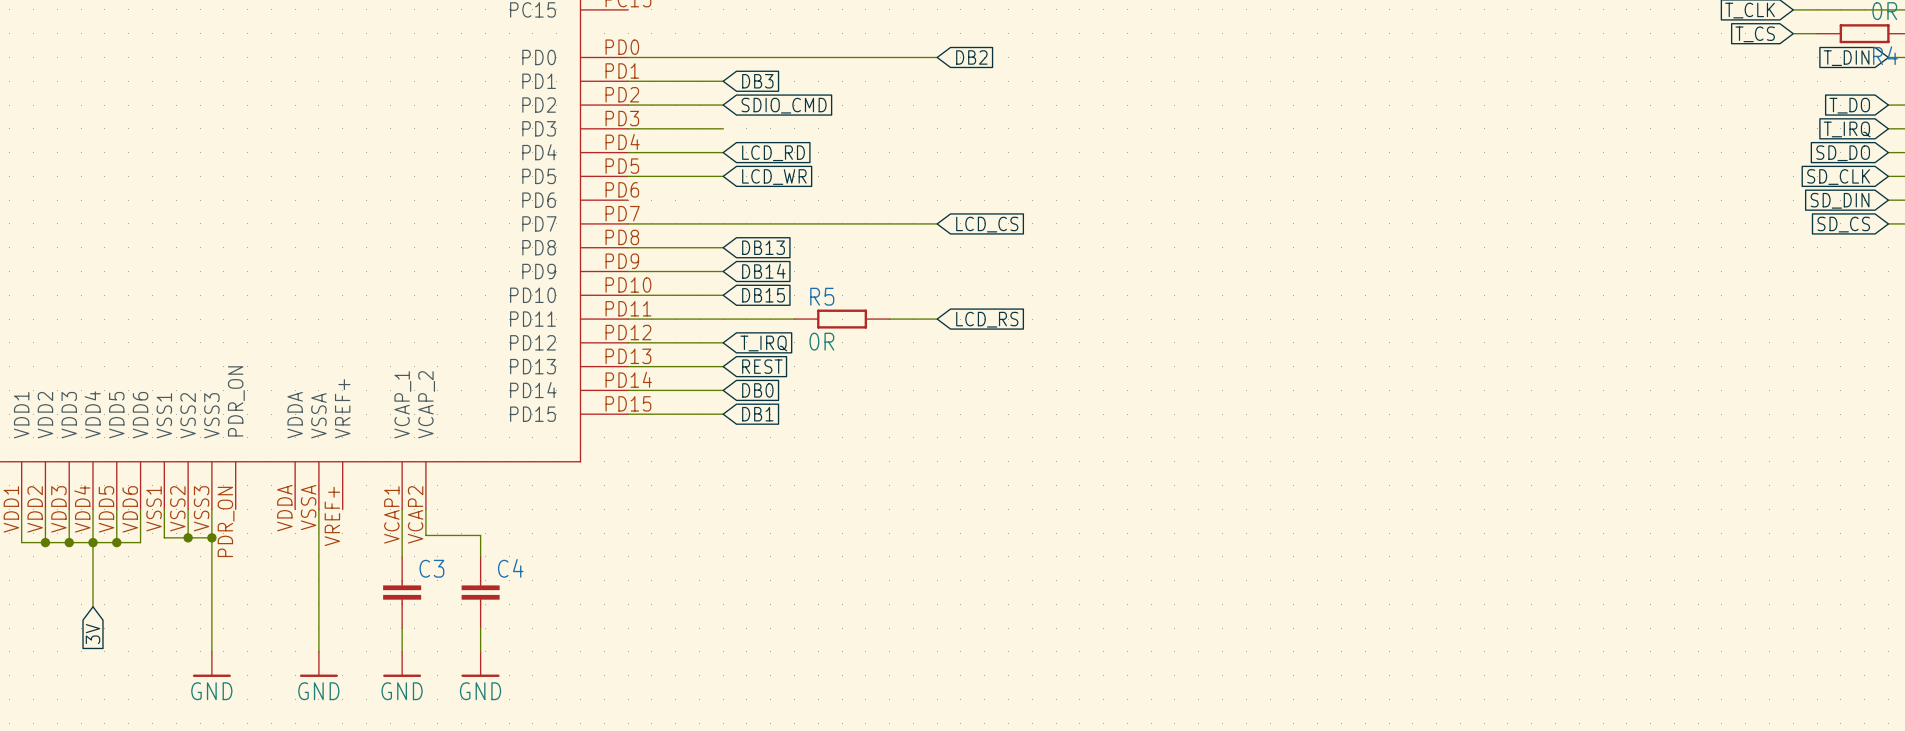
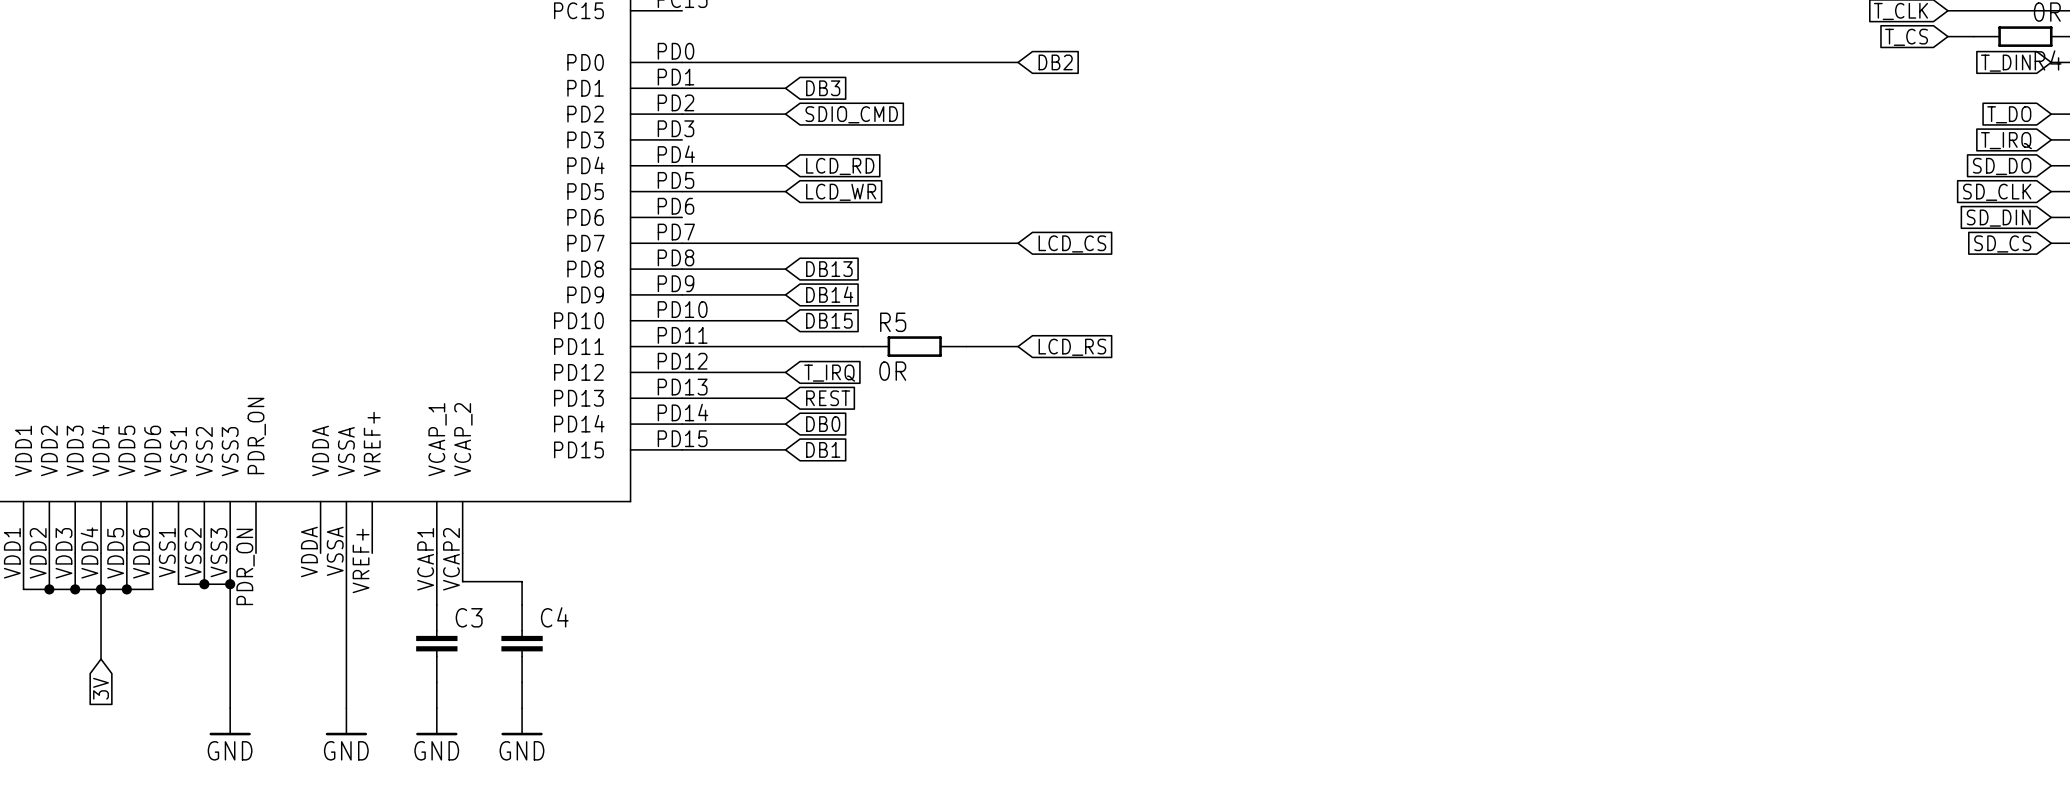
wire: (628, 128) (723, 128) -> none

